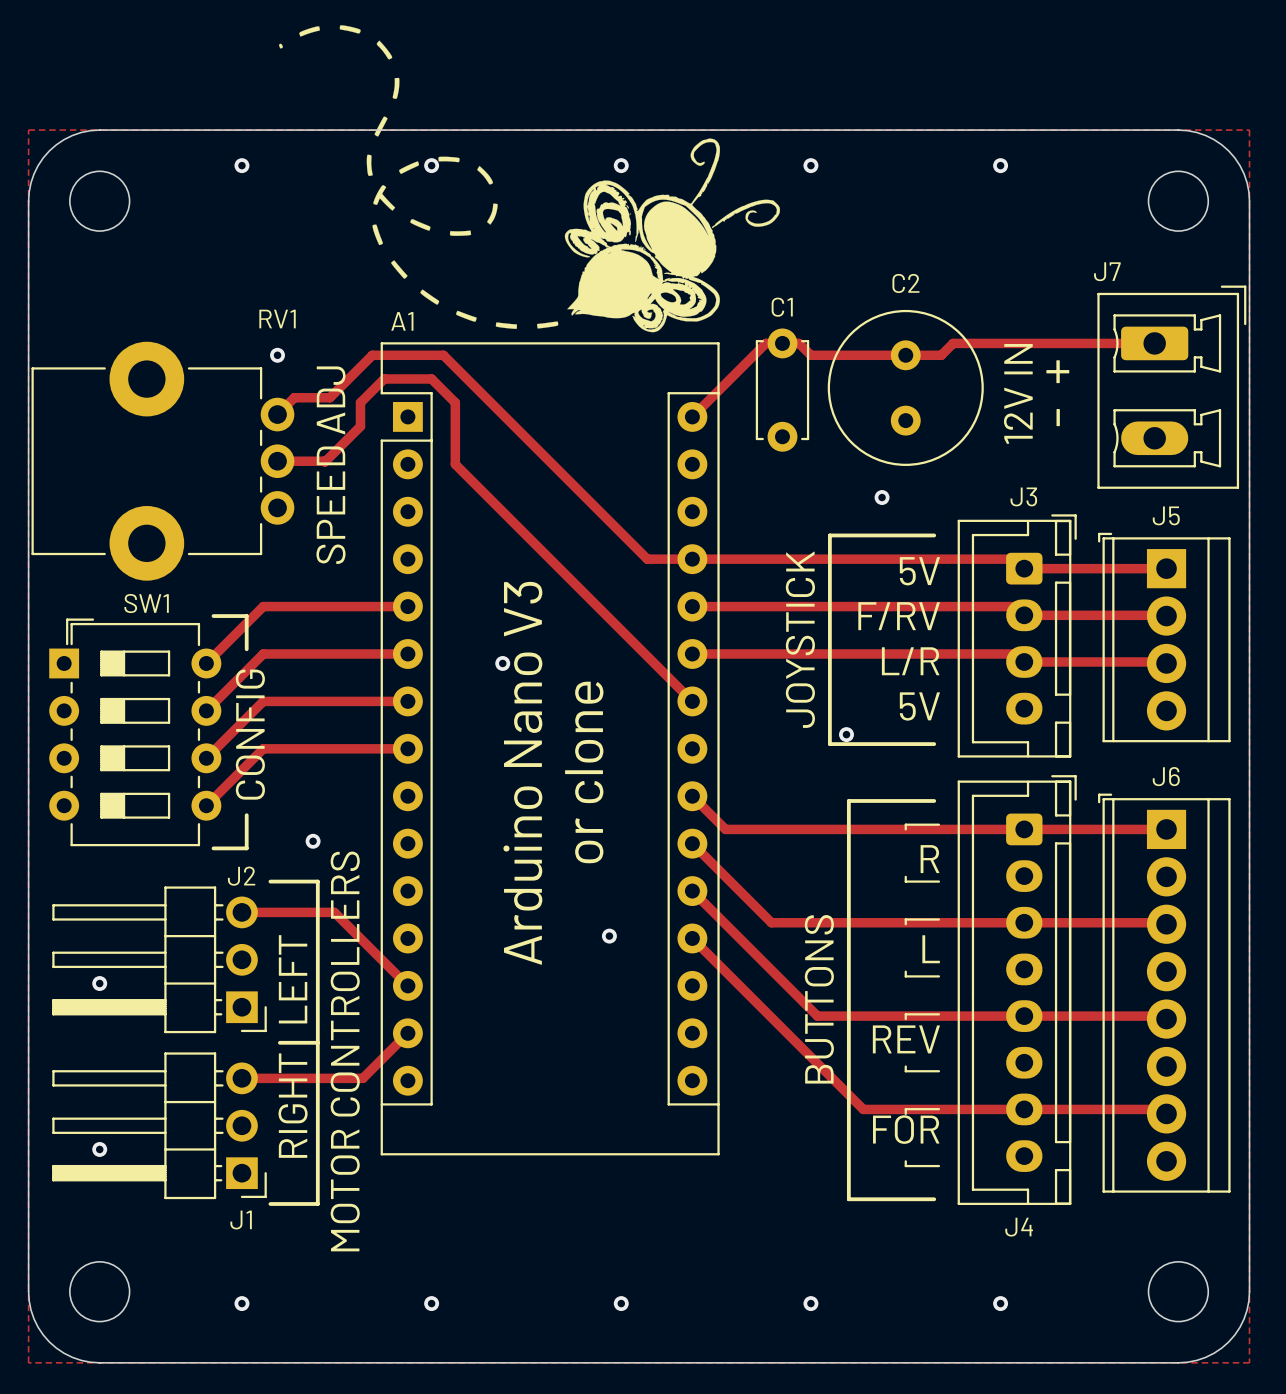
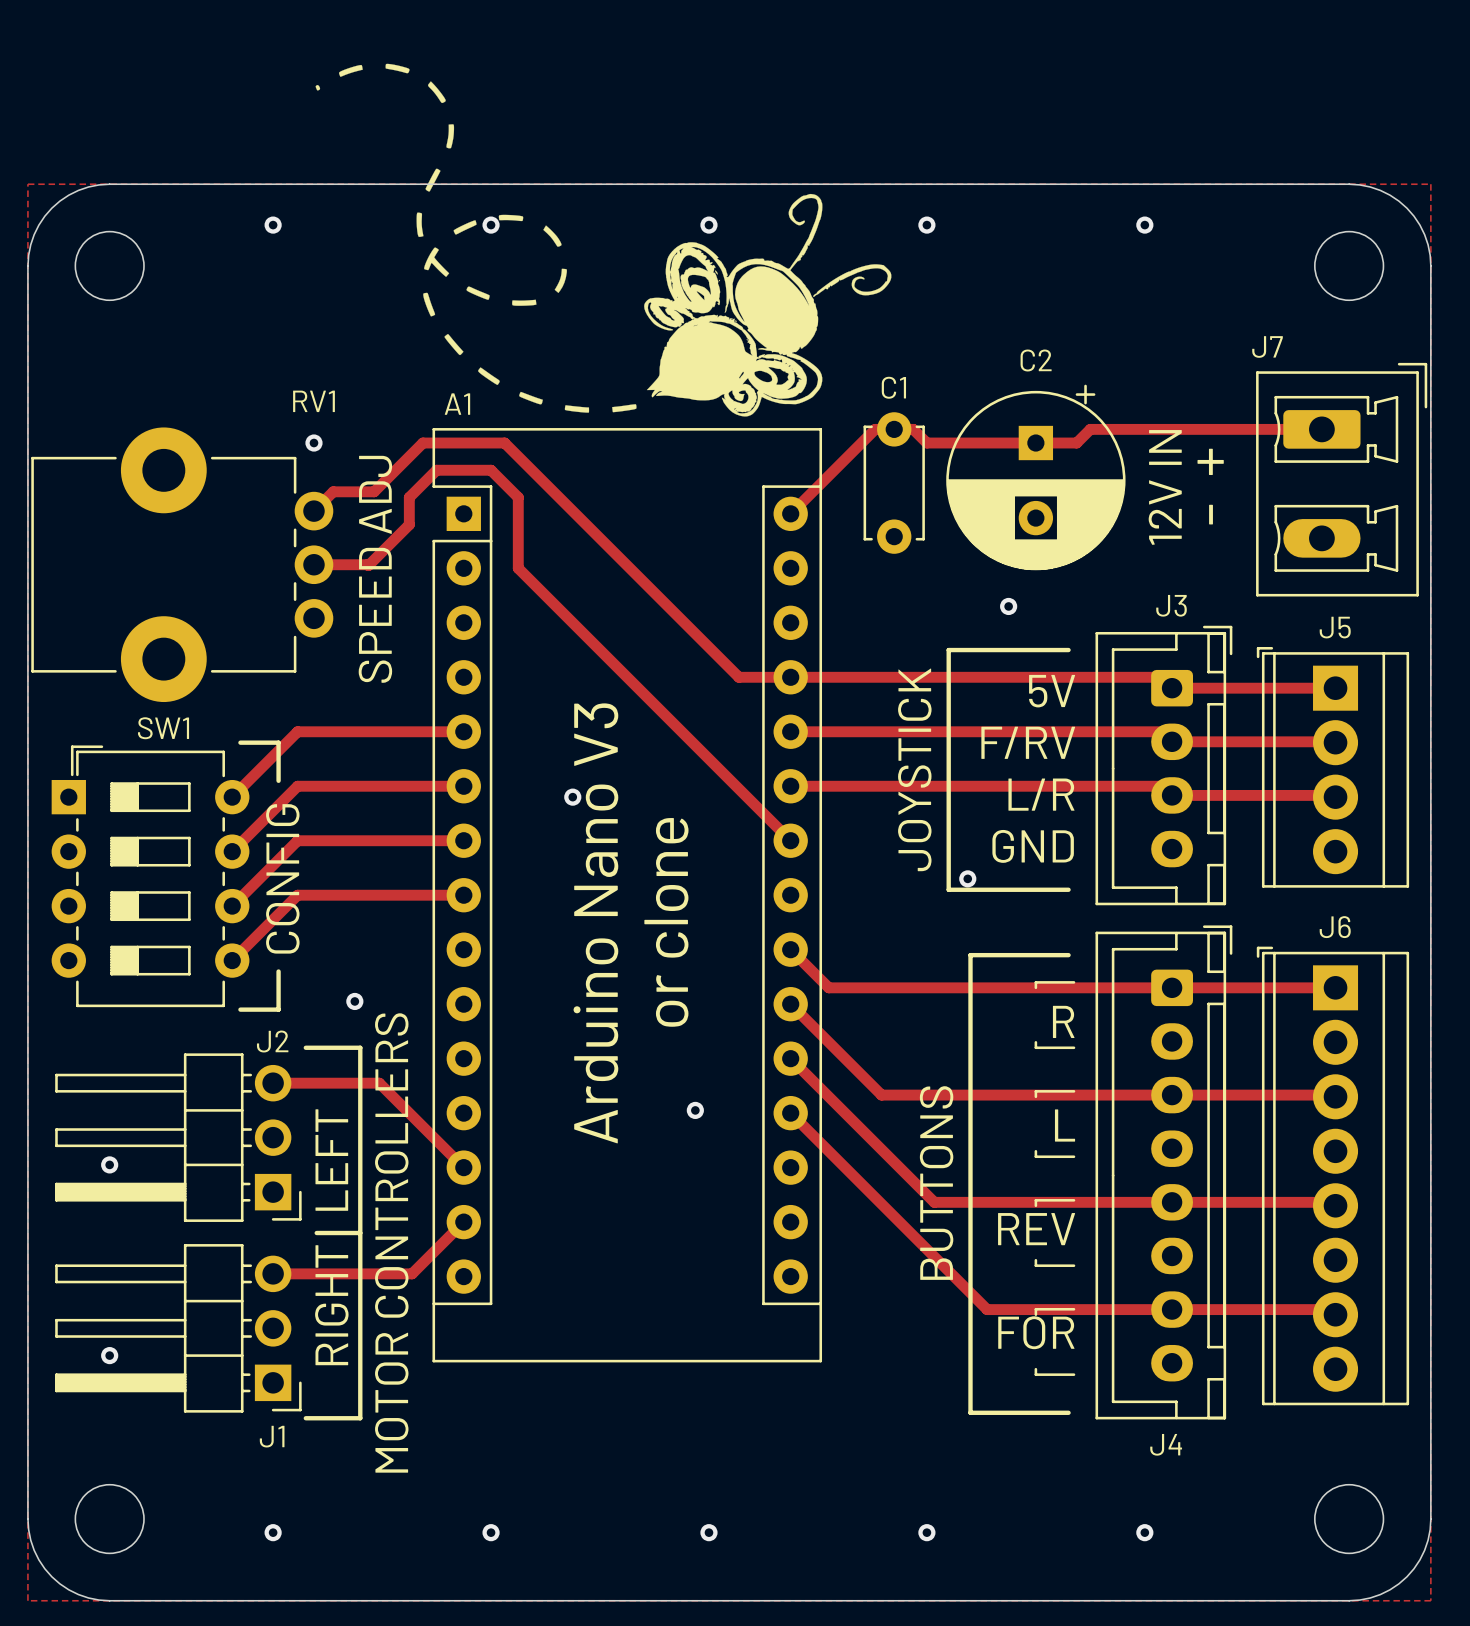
C2 footprint: [827, 309, 984, 466] -> [946, 384, 1126, 571]
text: 5V (919, 706) -> GND (1033, 846)

